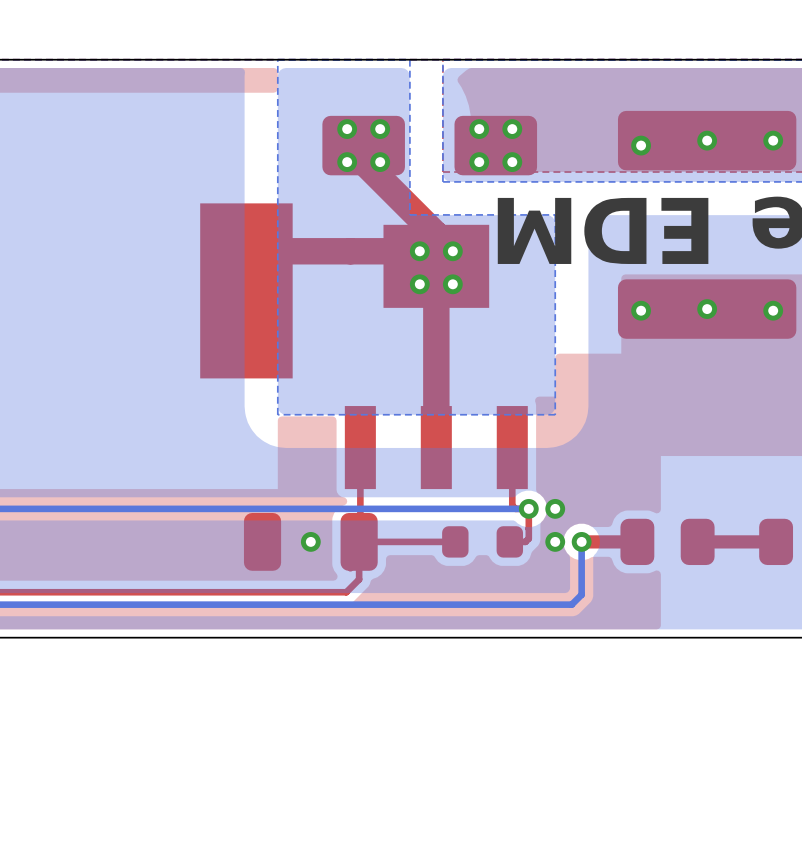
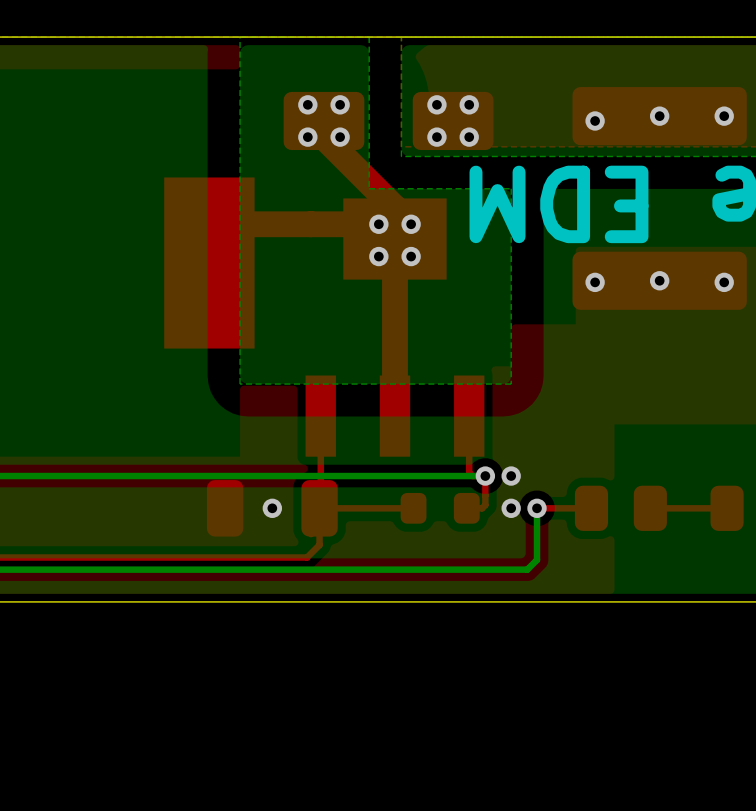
top track width: thick (637, 541) (581, 541) -> thin (591, 508) (537, 508)
top track width: thick (776, 541) (697, 541) -> thin (727, 508) (650, 508)

